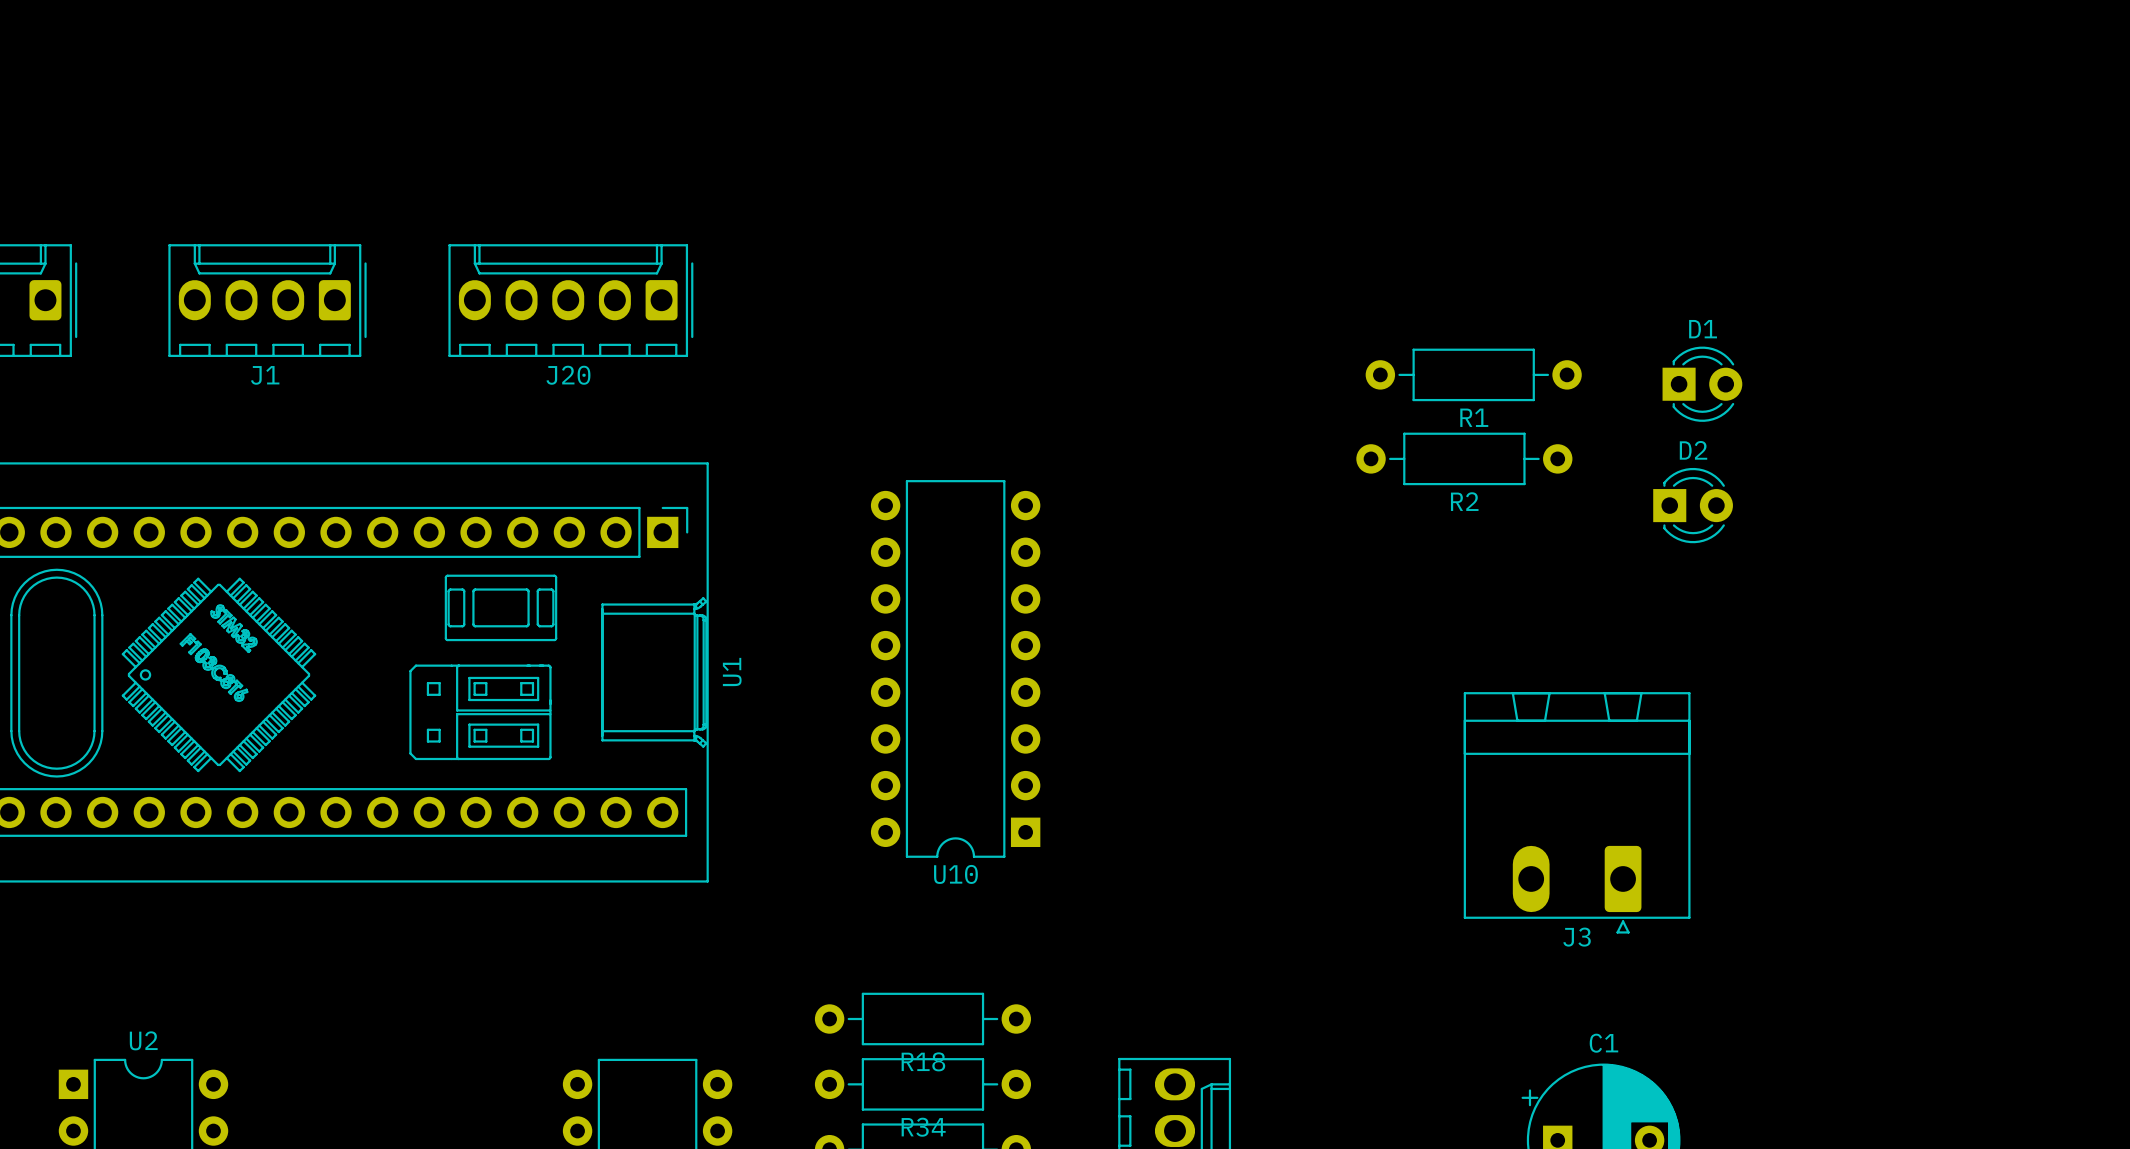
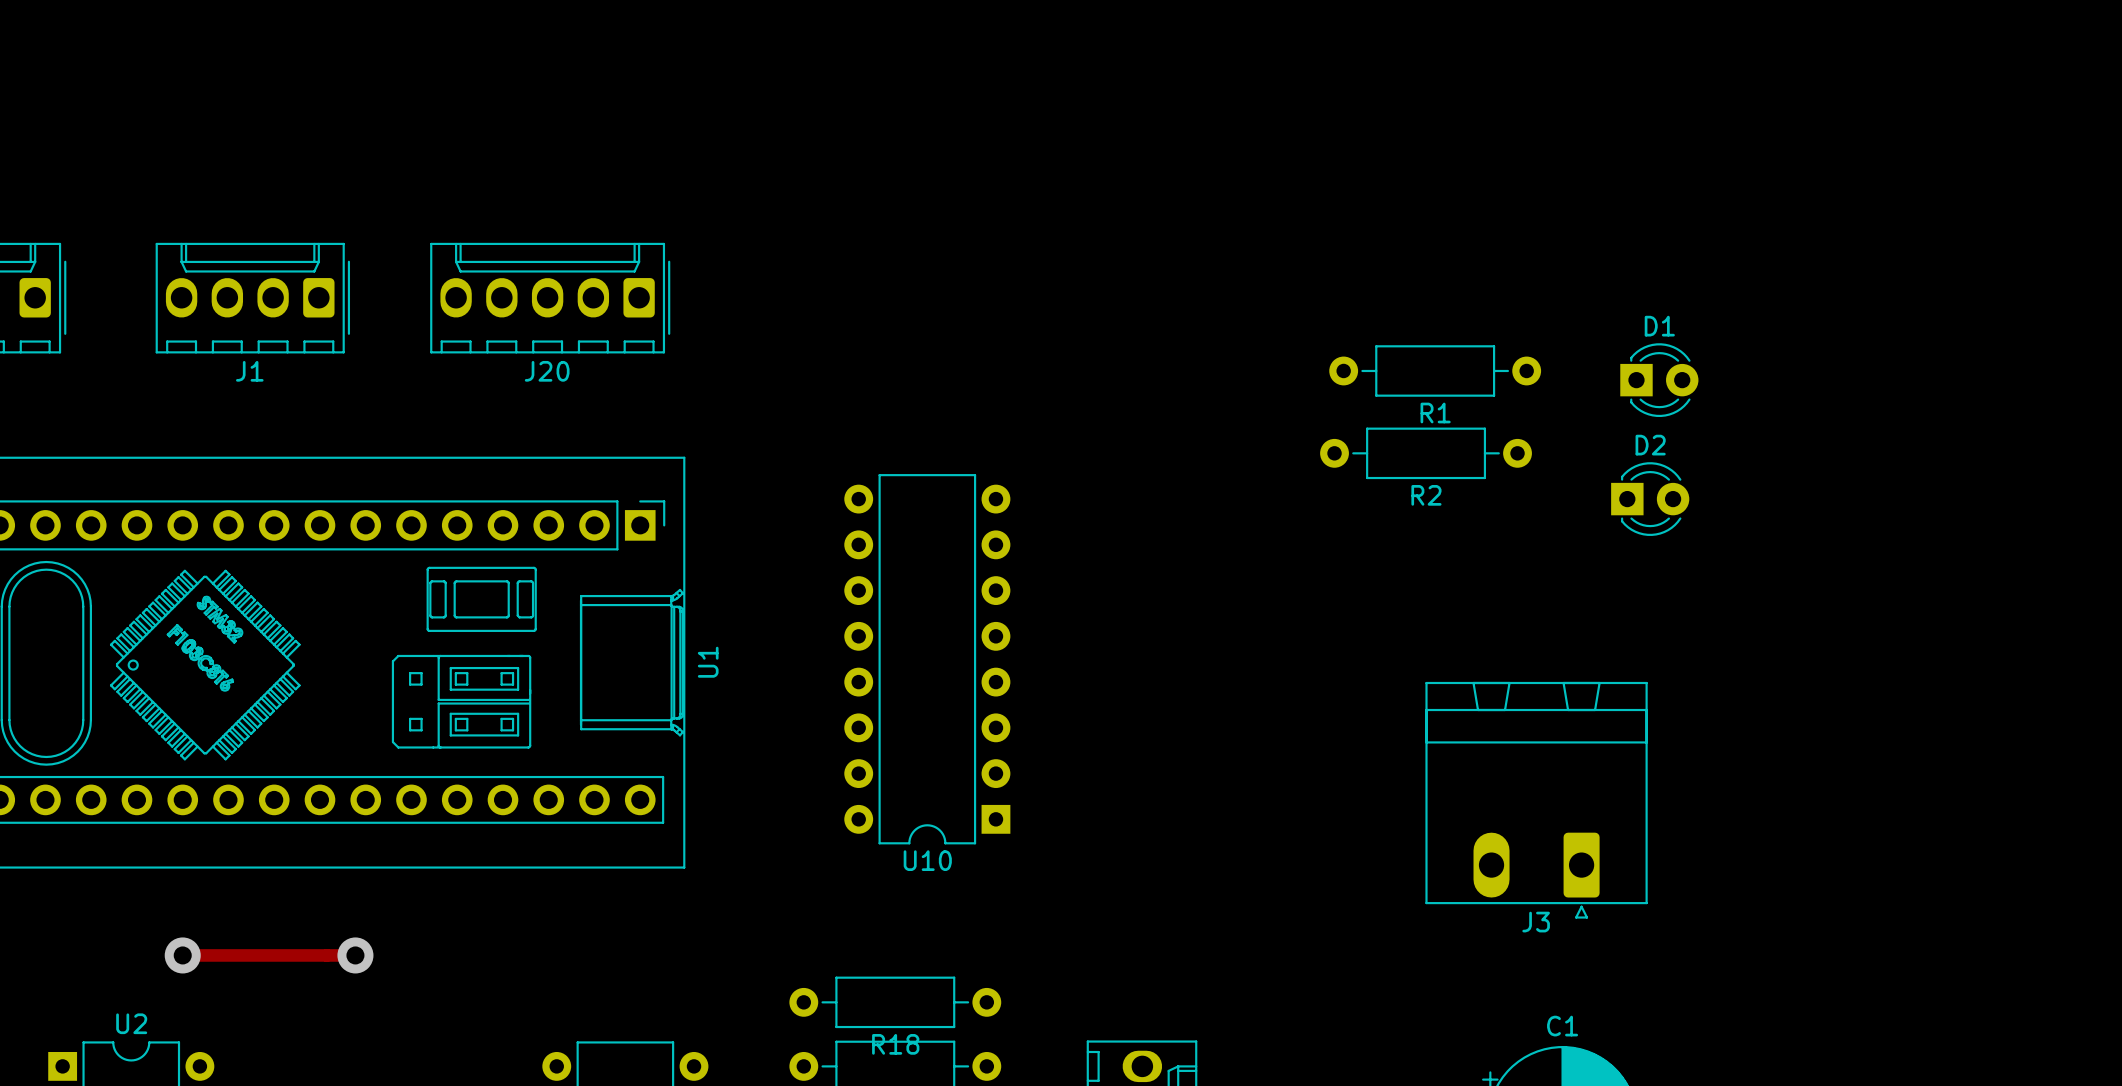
track: none -> (182, 955) (355, 955)
via: none -> (182, 955)
via: none -> (355, 955)

